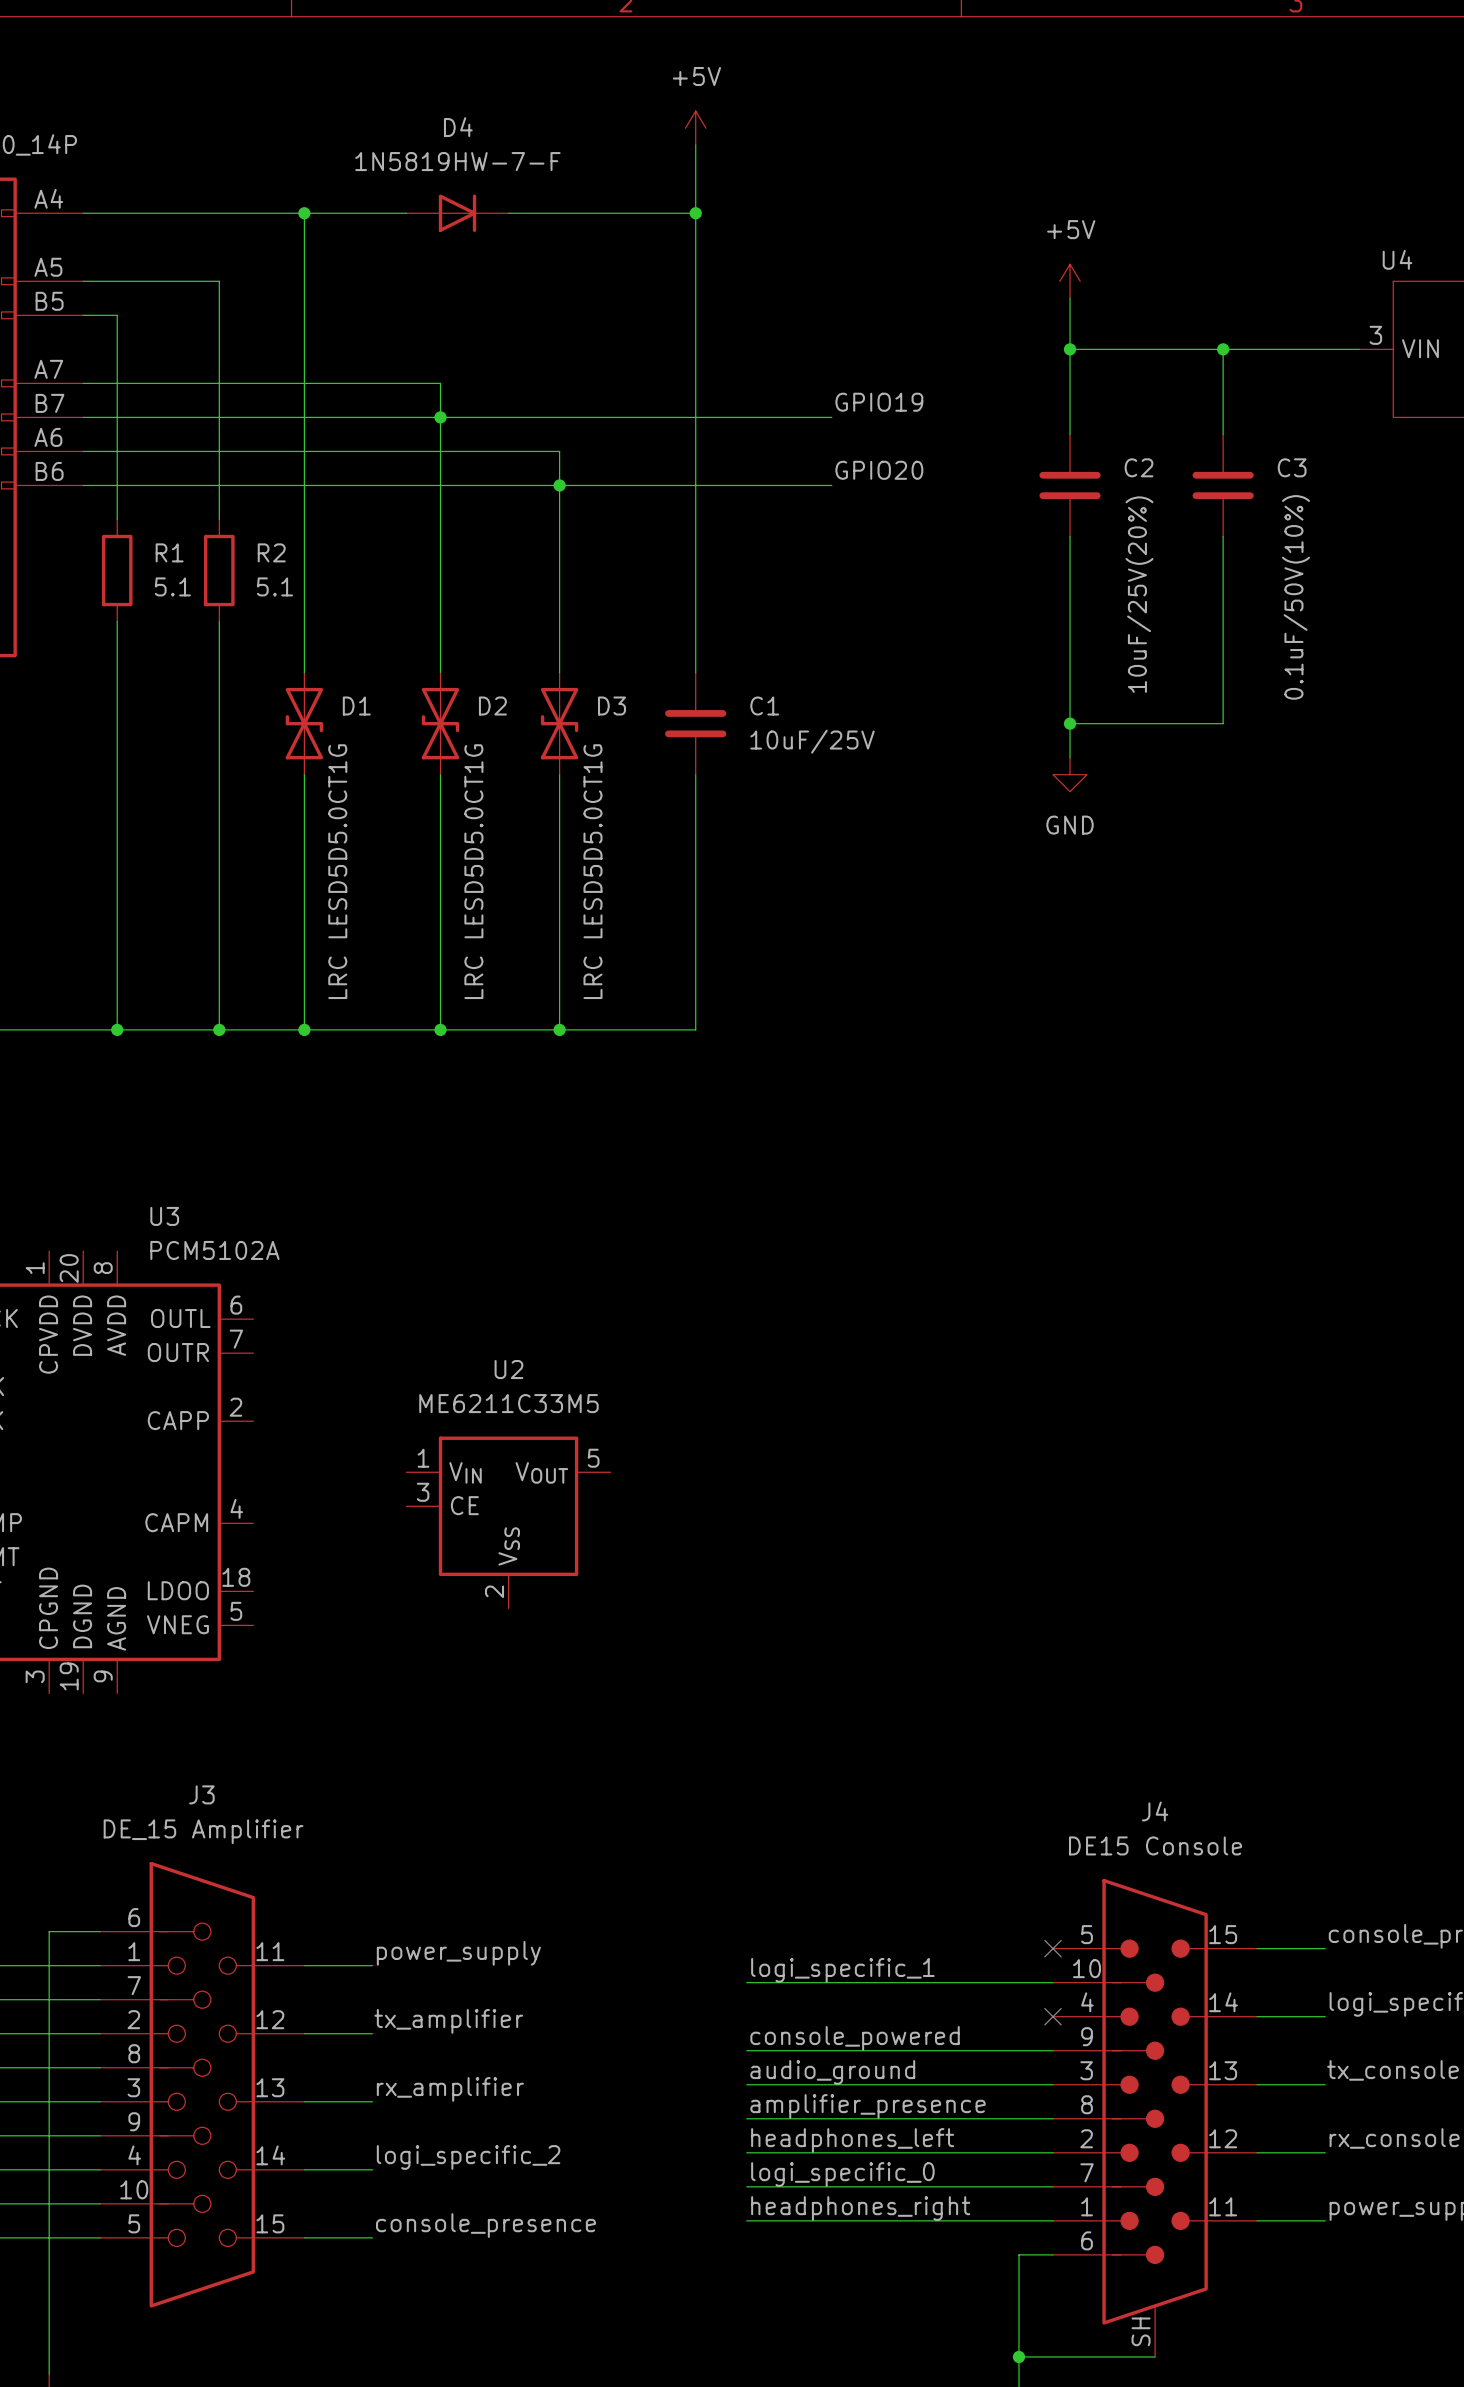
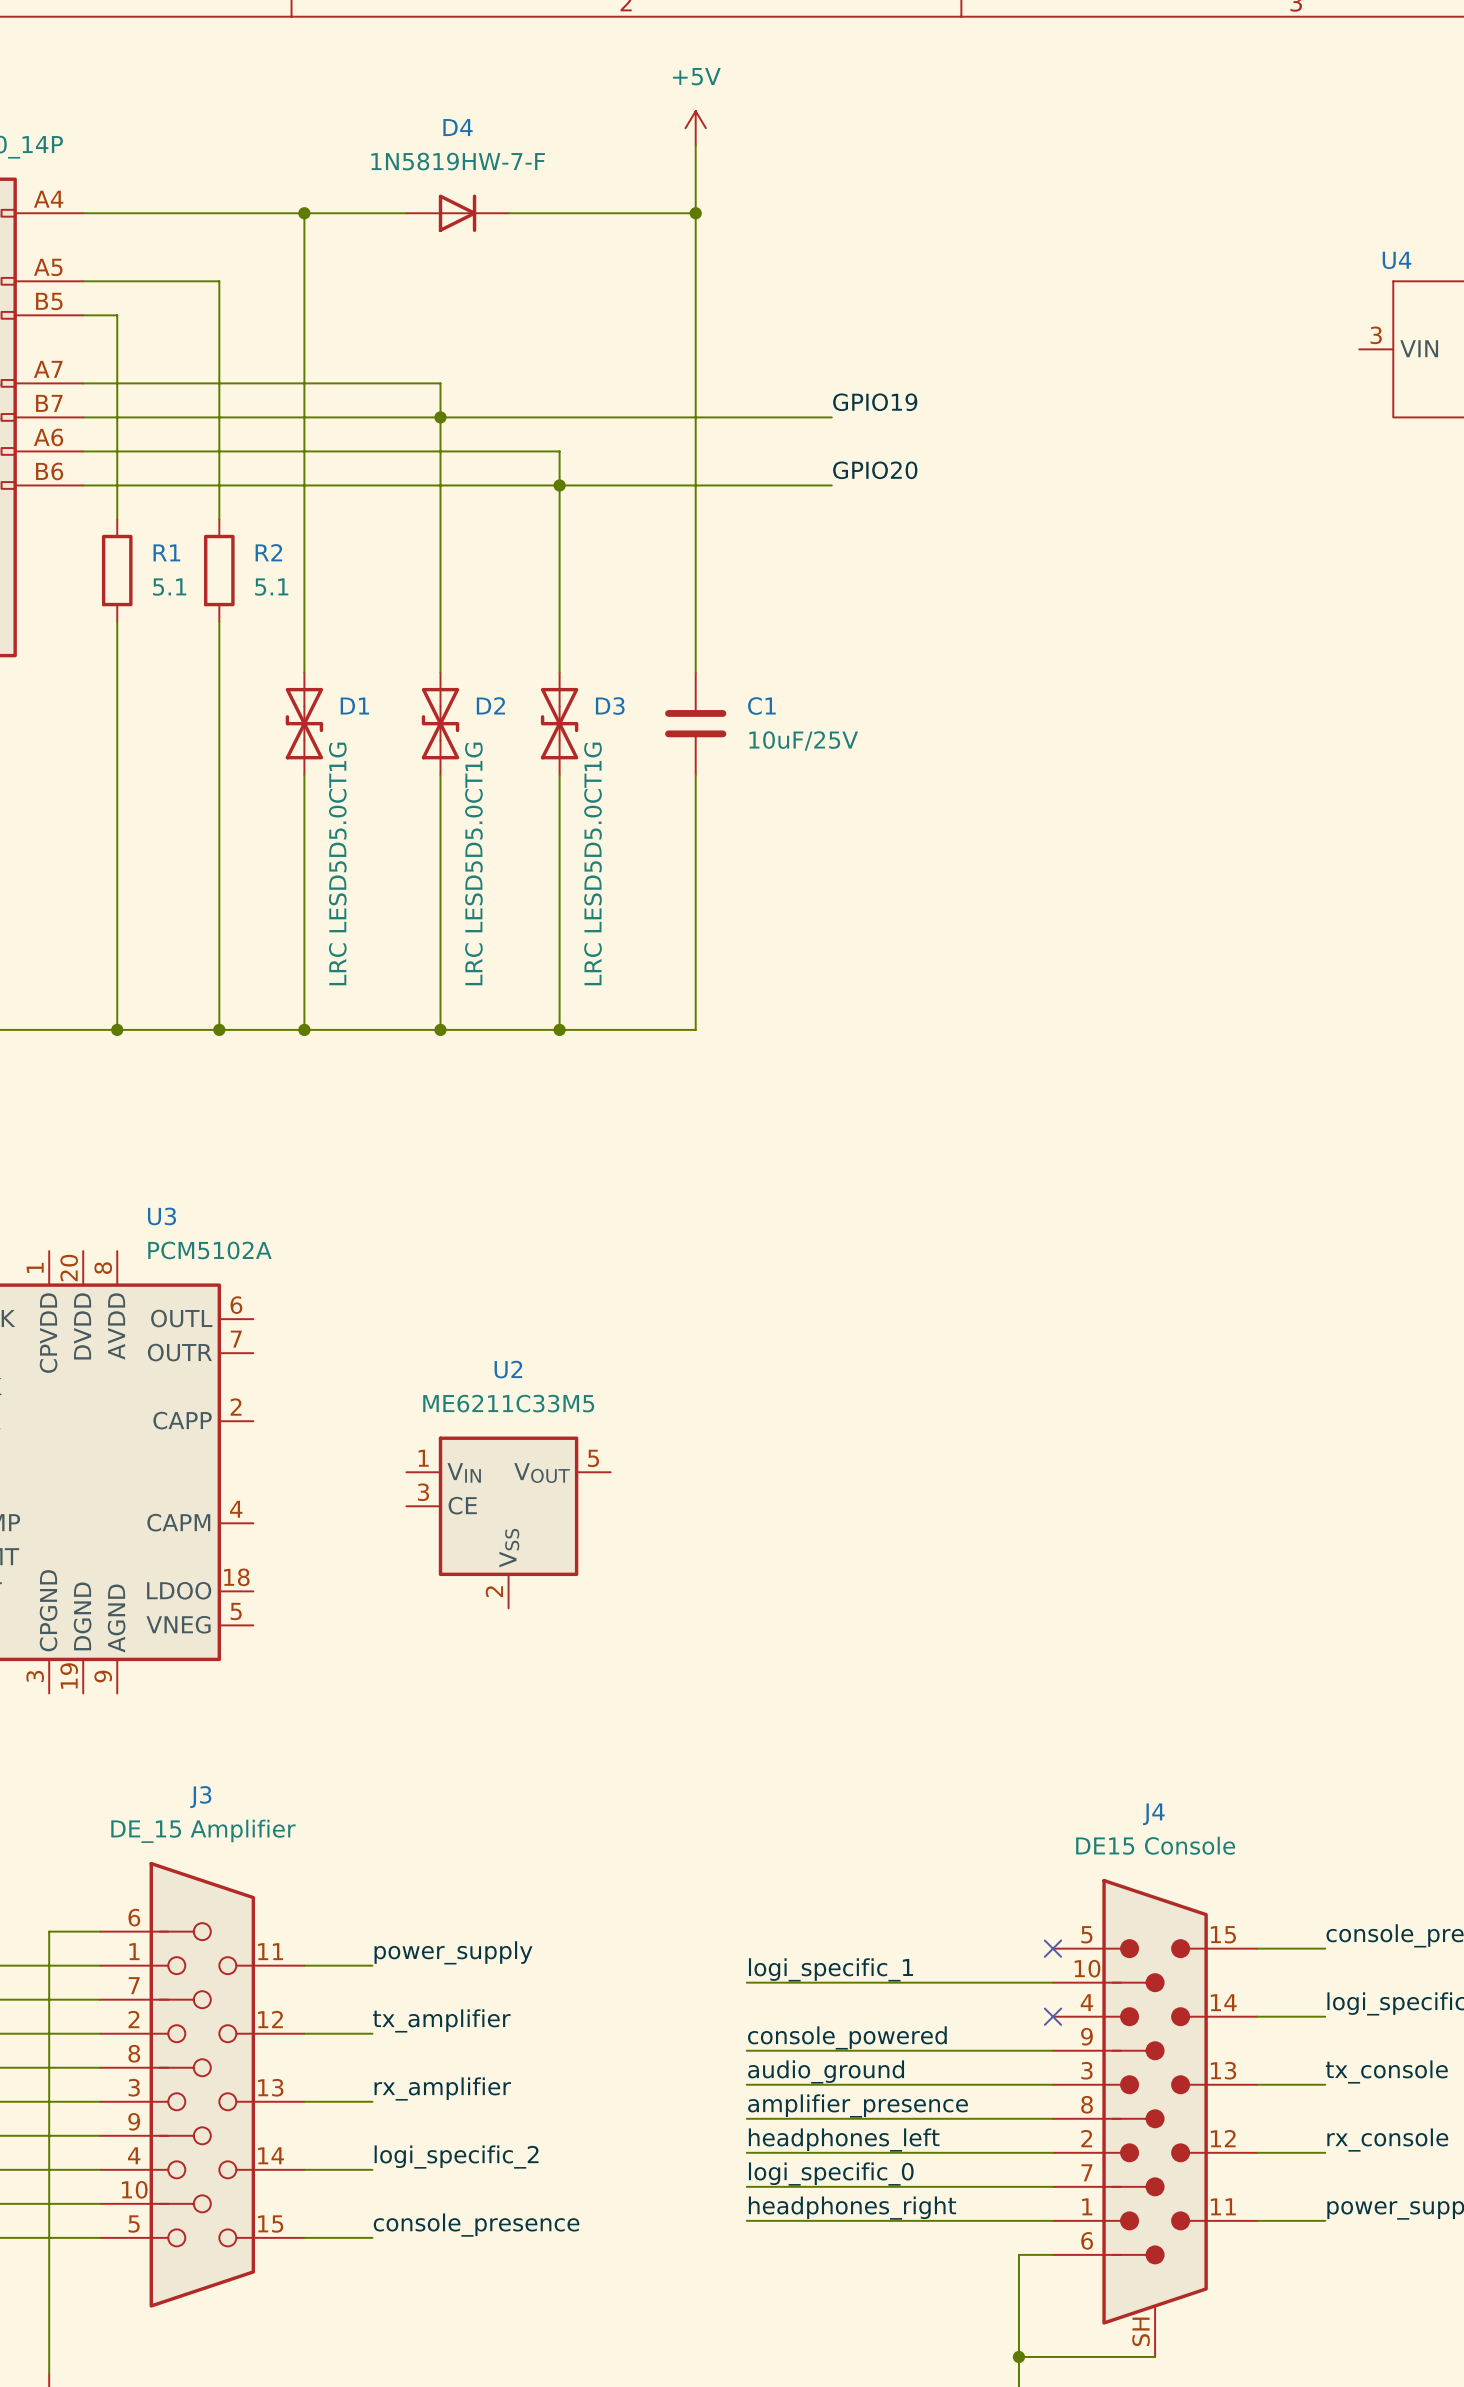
power symbol: +5V (1070, 281) -> none
wire: (1070, 298) (1070, 434) -> none
wire: (1070, 349) (1359, 349) -> none
junction: (1070, 349) -> none
wire: (1223, 349) (1223, 434) -> none
junction: (1223, 349) -> none
C2: 10uF/25V(20%) (1070, 485) -> none
C3: 0.1uF/50V(10%) (1223, 485) -> none
wire: (1070, 536) (1070, 757) -> none
wire: (1223, 536) (1223, 723) (1070, 723) -> none
junction: (1070, 723) -> none
power symbol: GND (1070, 774) -> none

